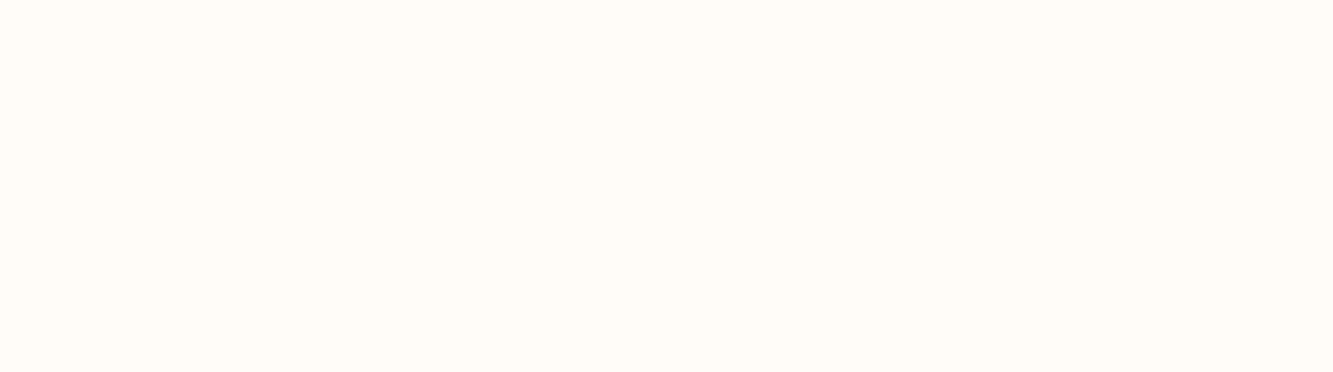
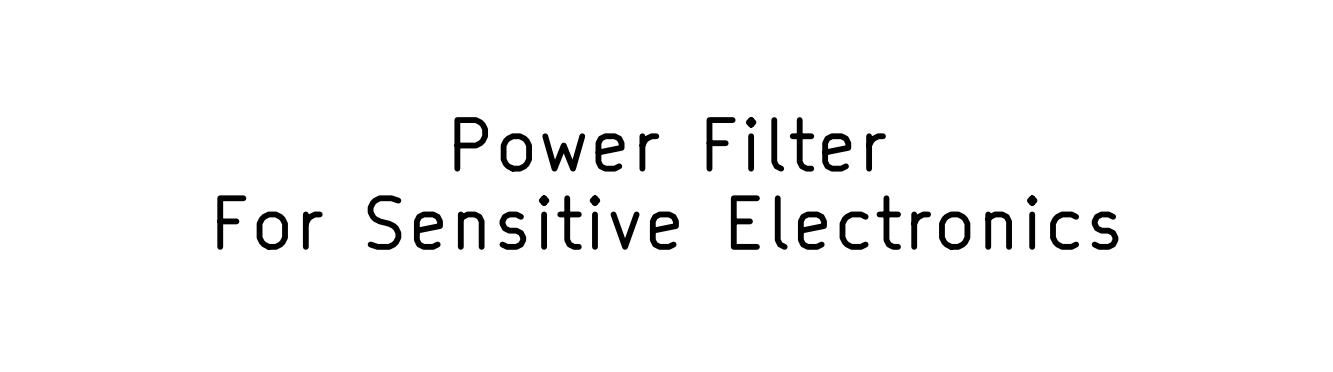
text: none -> Power Filter (670, 144)
text: none -> For Sensitive Electronics (667, 222)

